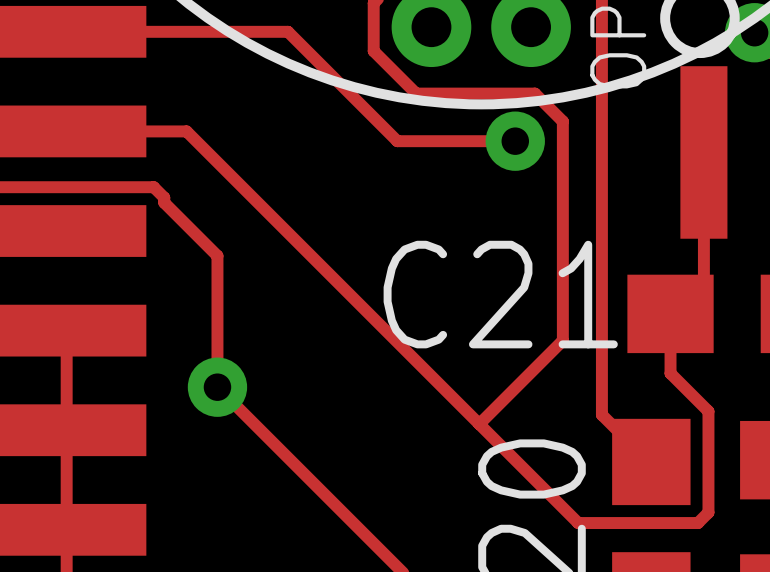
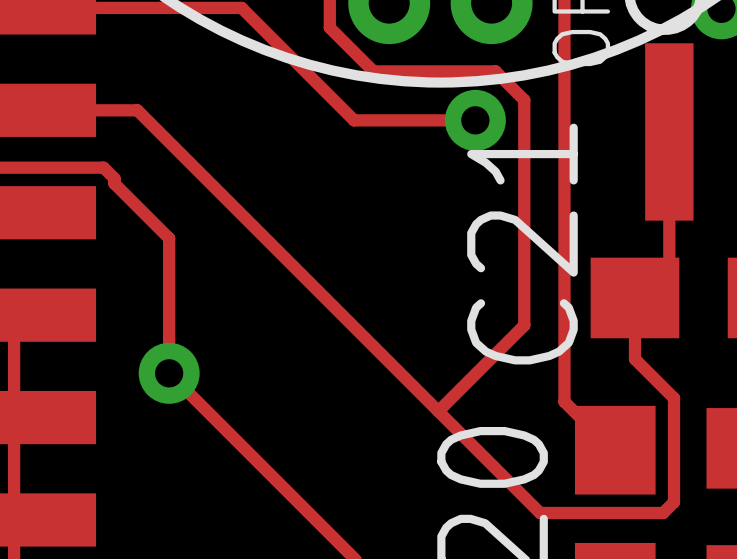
C21 name rotation: 0° (500, 294) -> 90° counterclockwise (522, 244)

